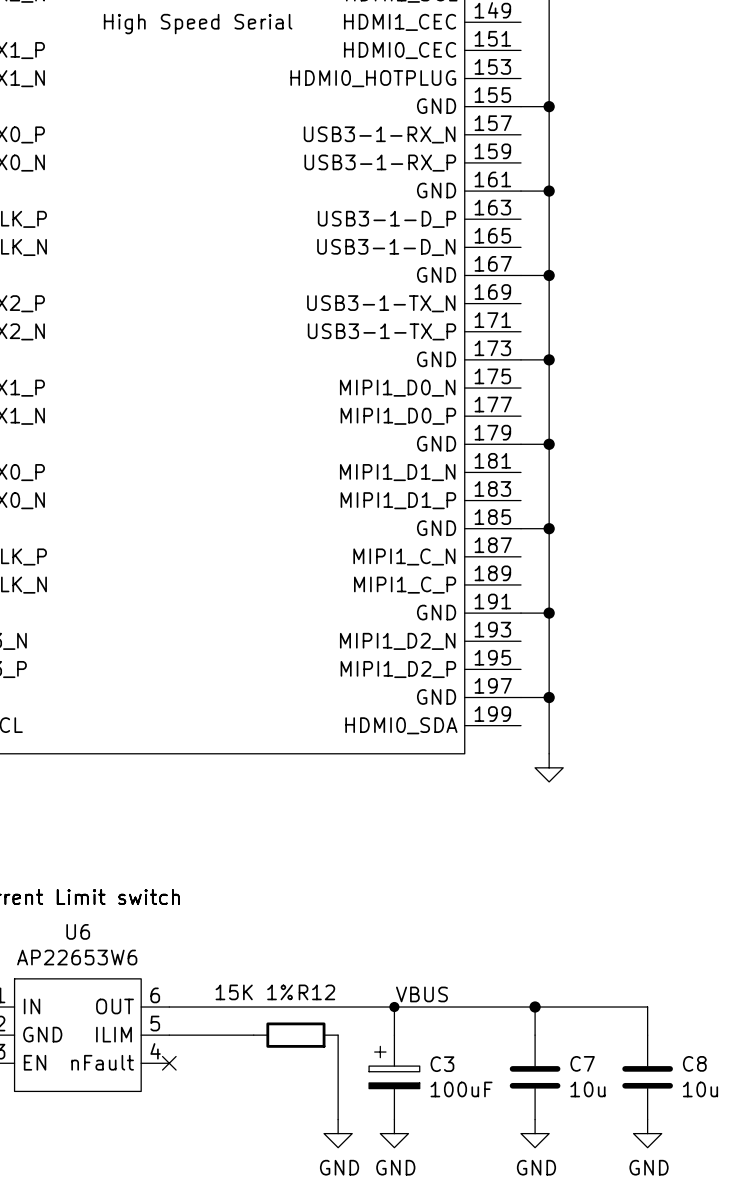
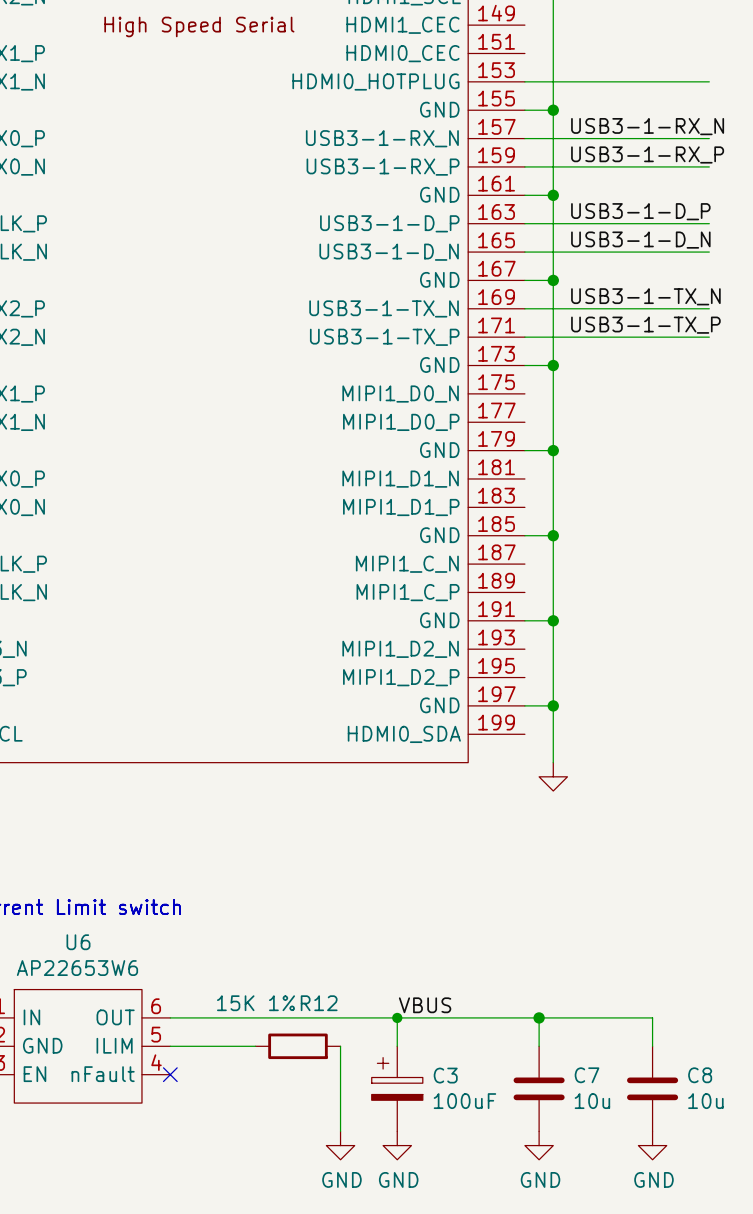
wire: none -> (524, 81) (709, 81)
label: none -> USB3-1-RX_N (647, 126)
wire: none -> (524, 138) (709, 138)
label: none -> USB3-1-RX_P (647, 154)
wire: none -> (524, 166) (709, 166)
label: none -> USB3-1-D_P (640, 211)
wire: none -> (524, 223) (709, 223)
label: none -> USB3-1-D_N (640, 240)
wire: none -> (524, 252) (709, 252)
label: none -> USB3-1-TX_N (645, 296)
wire: none -> (524, 308) (709, 308)
label: none -> USB3-1-TX_P (645, 325)
wire: none -> (524, 337) (709, 337)

